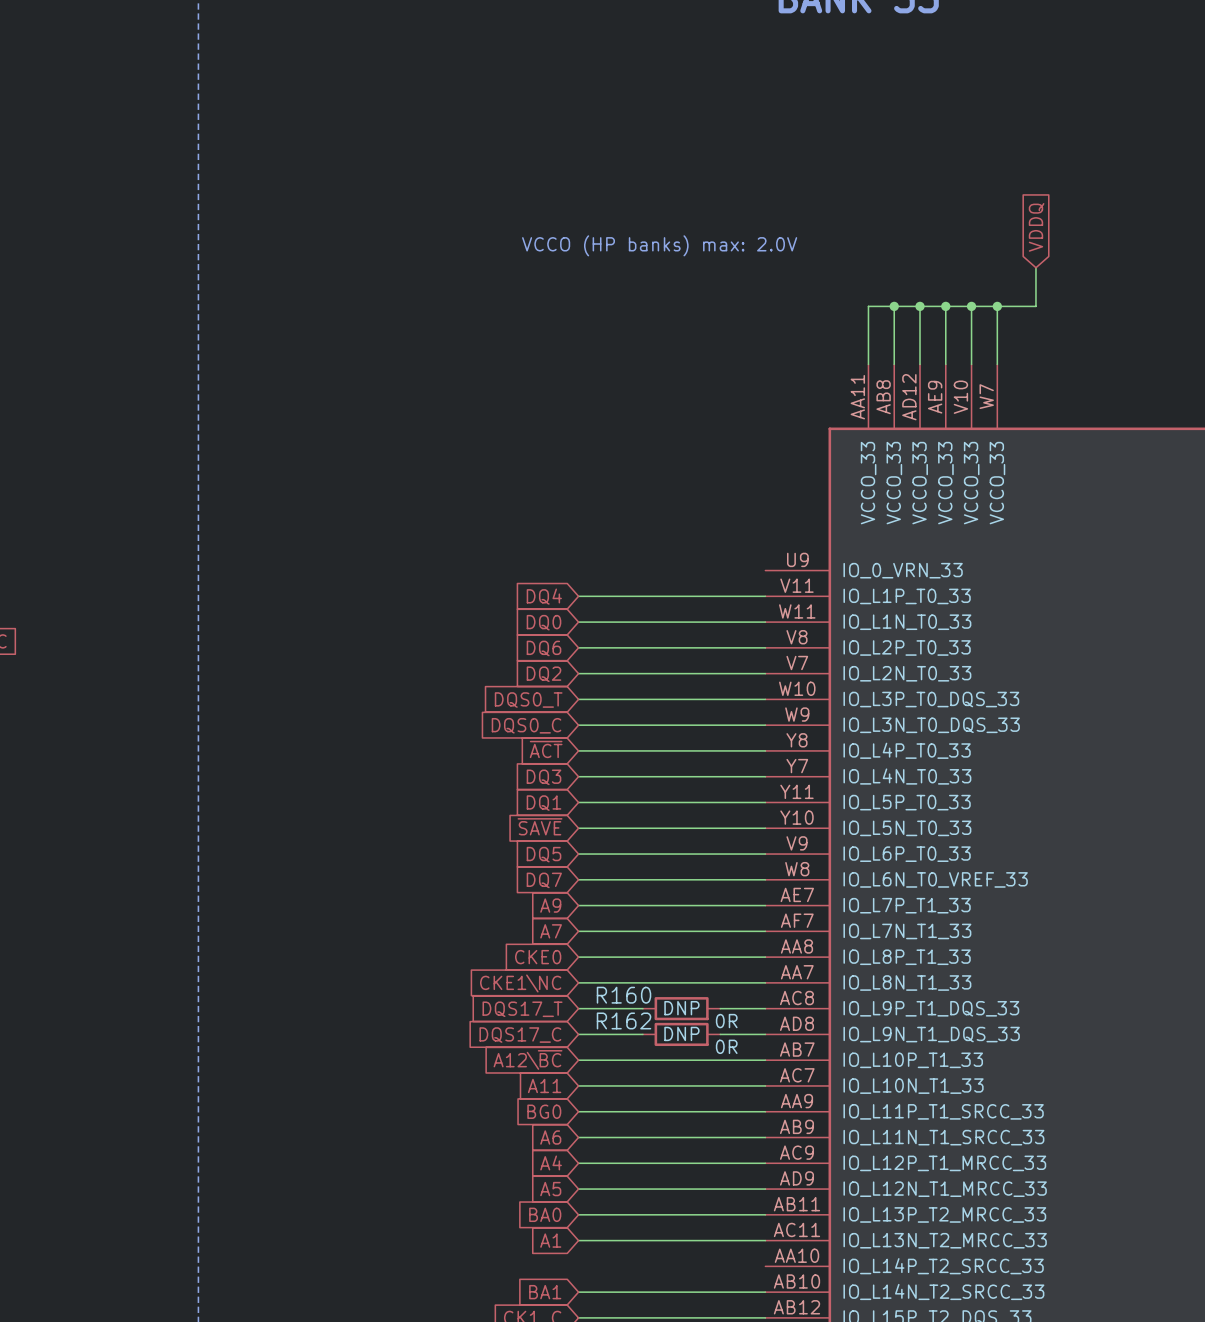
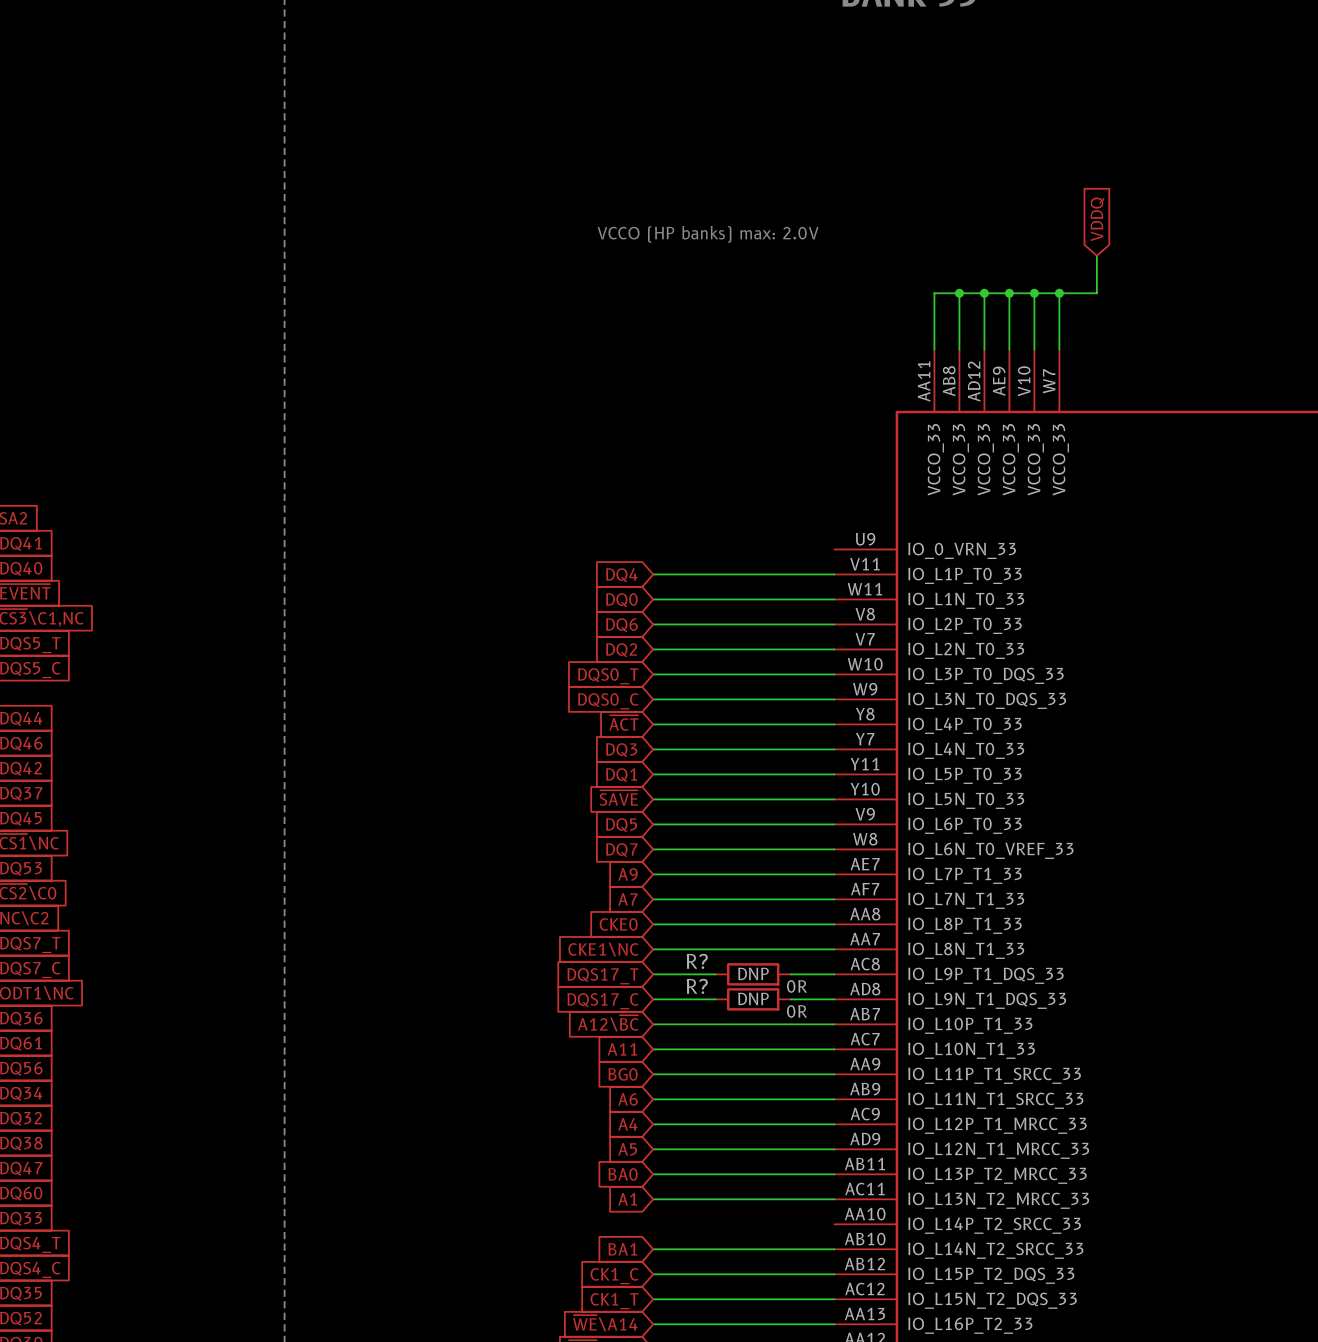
R160 name: R160 (624, 995) -> R? (697, 961)
R162 name: R162 (624, 1020) -> R? (697, 986)

